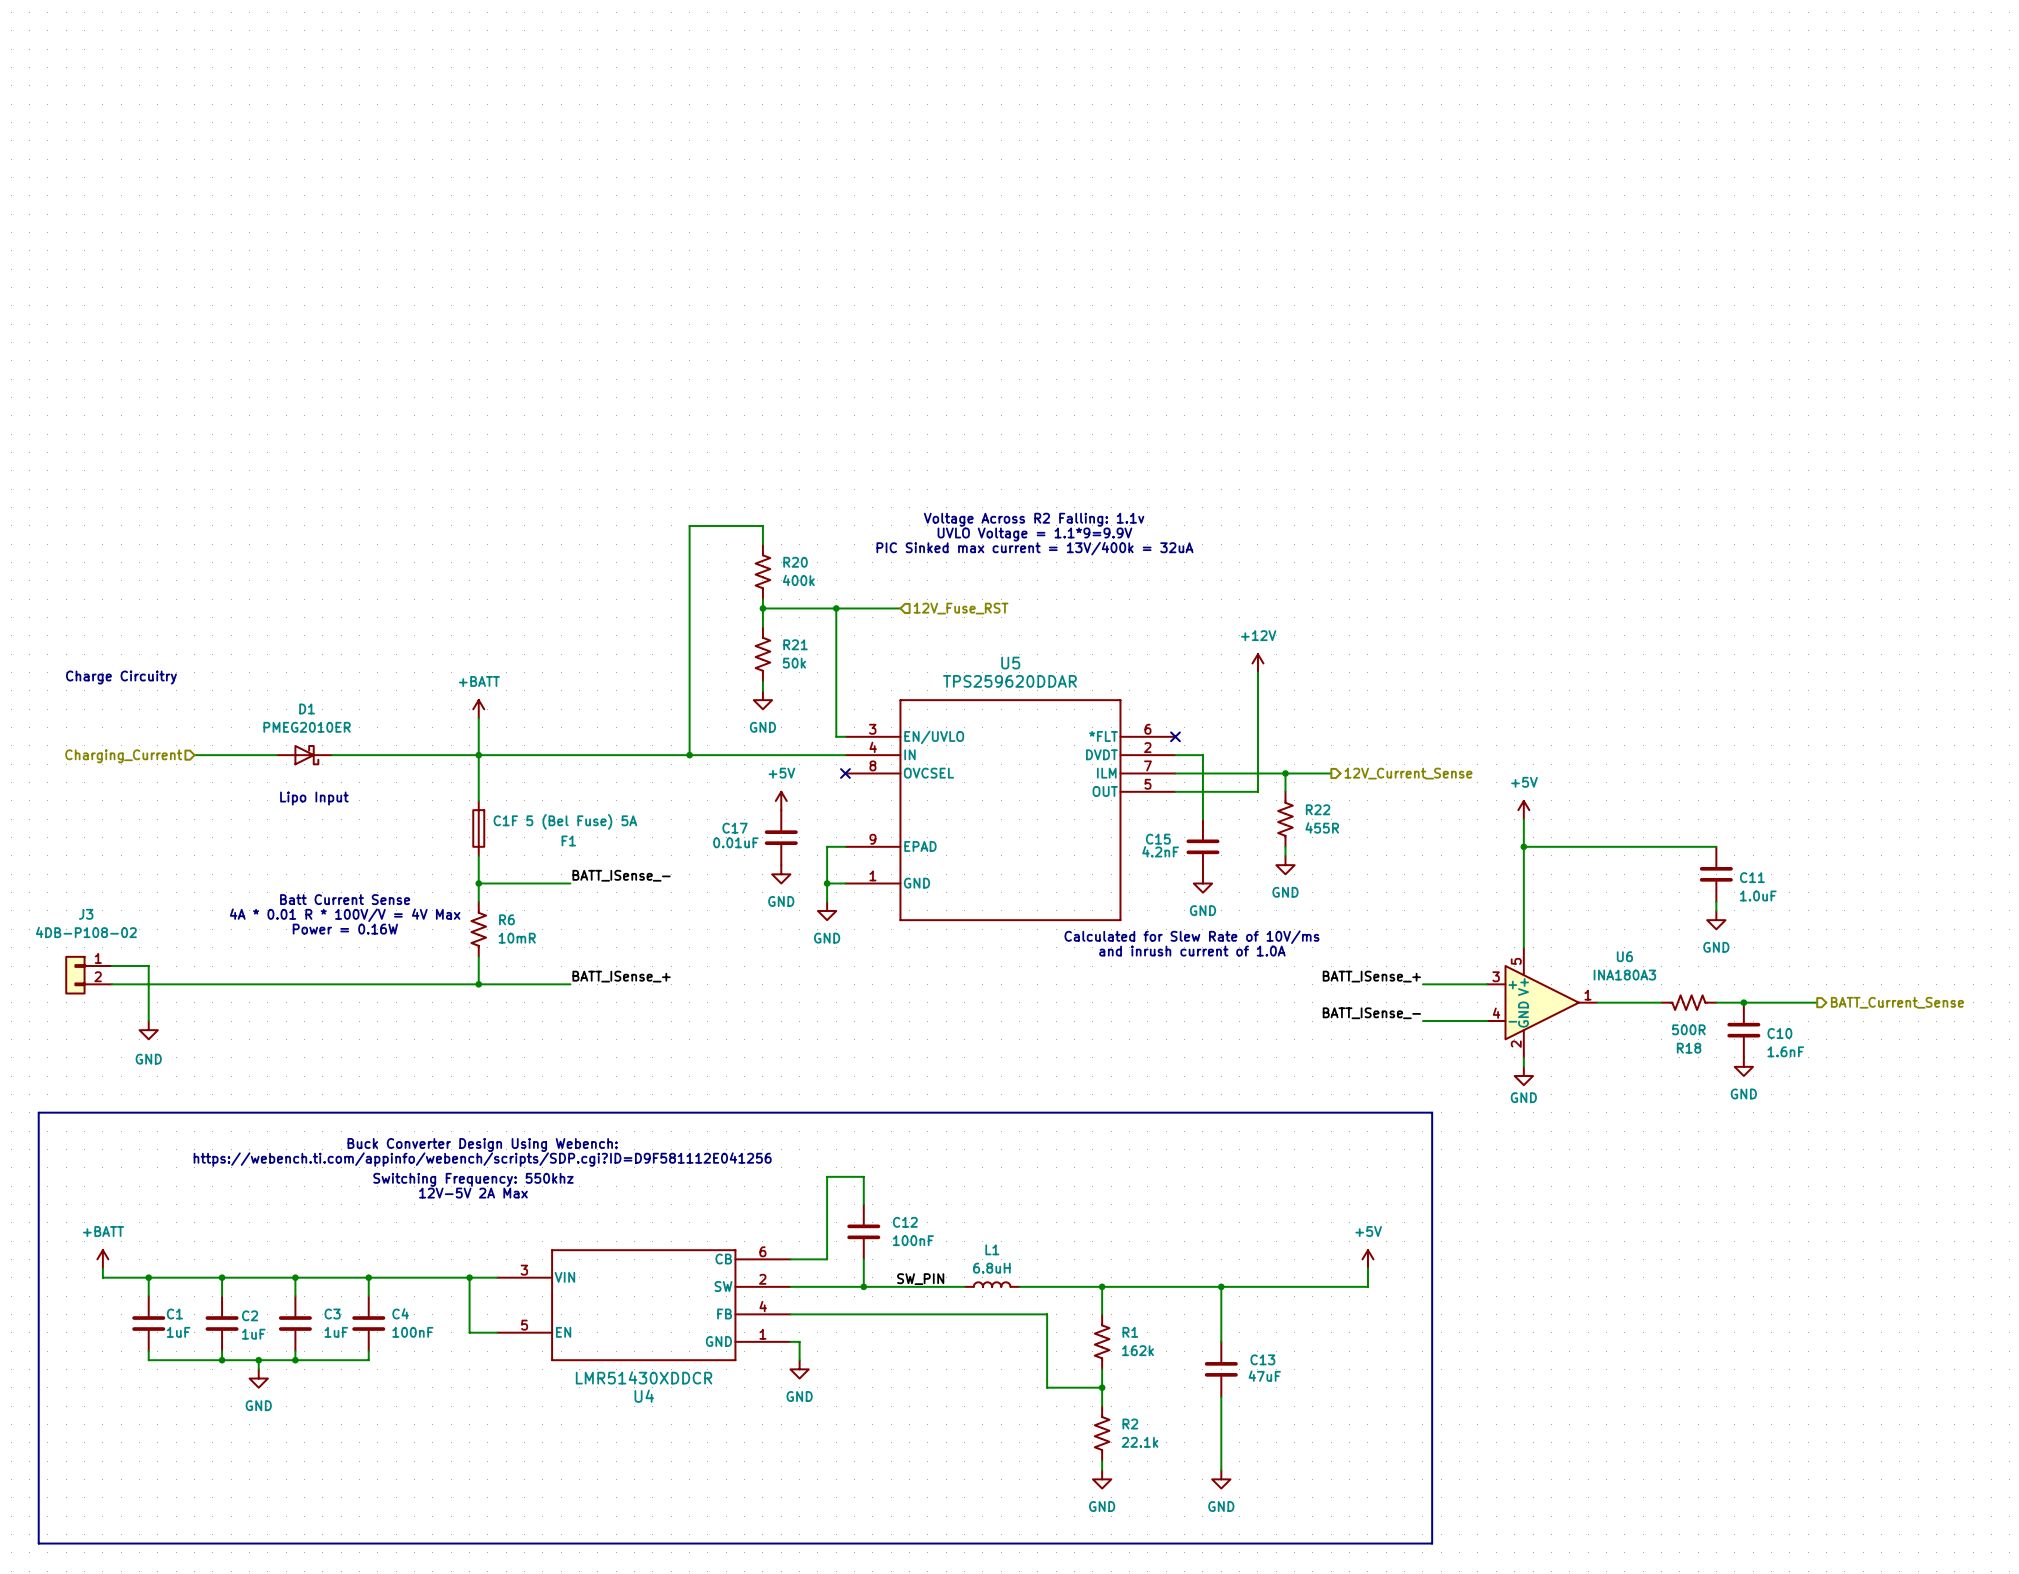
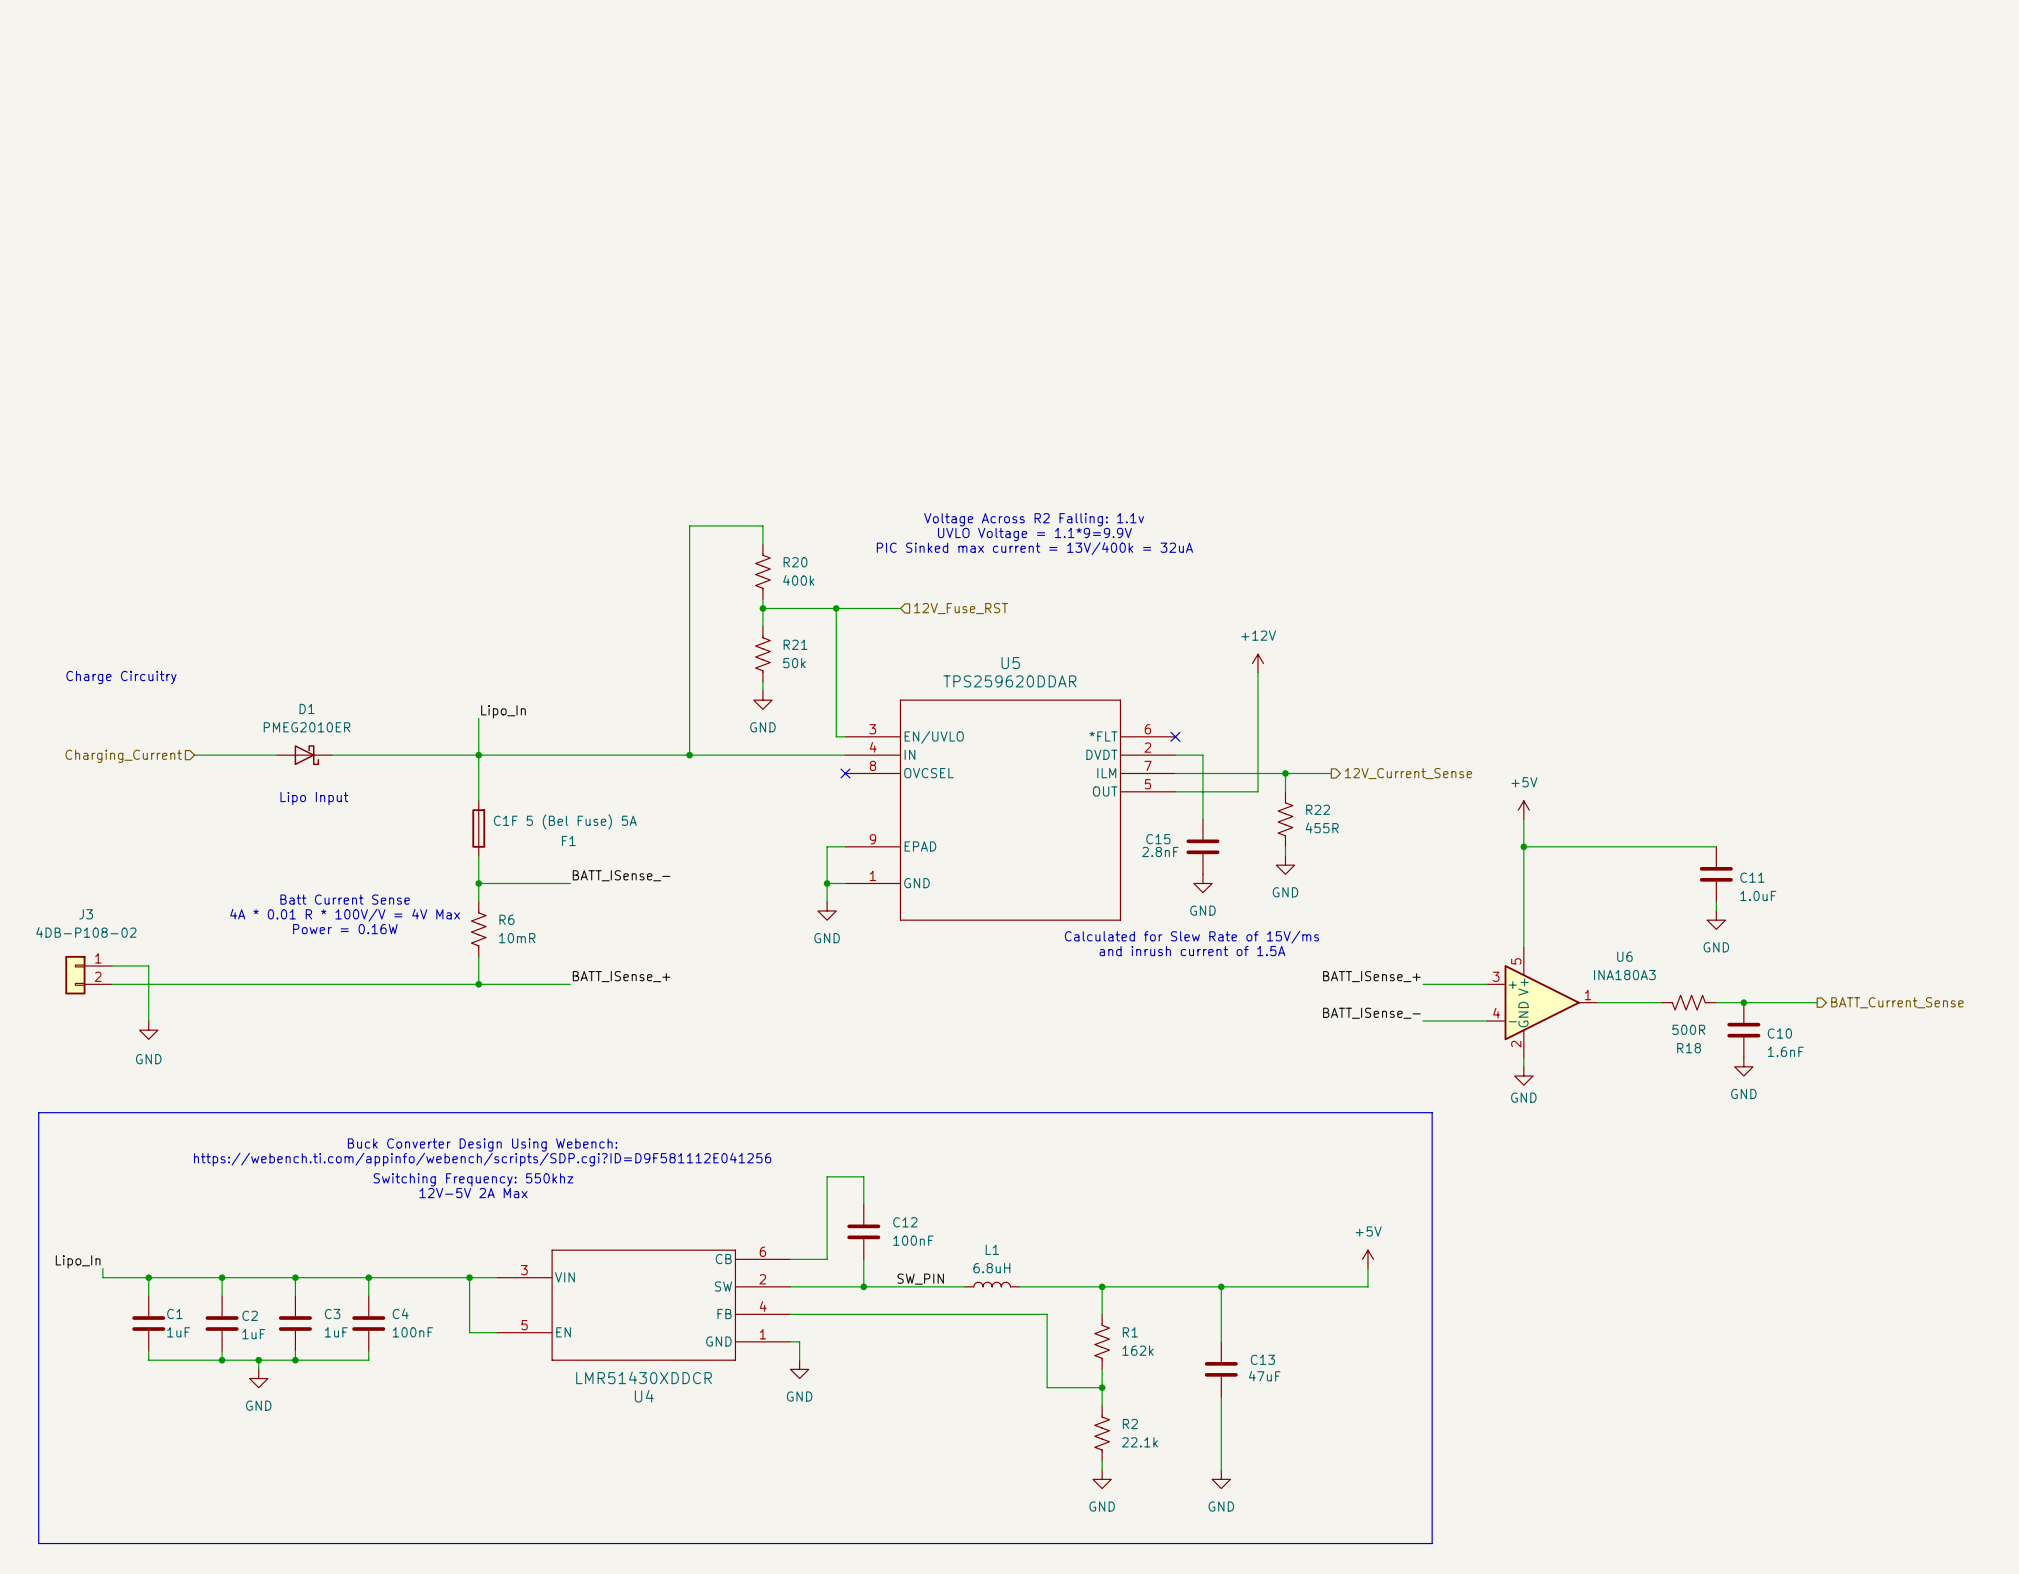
power symbol: +BATT (478, 709) -> none
label: none -> Lipo_In (503, 711)
power symbol: +5V (781, 800) -> none
C17: 0.01uF (781, 837) -> none
C15 value: 4.2nF (1160, 851) -> 2.8nF (1160, 851)
power symbol: GND (781, 874) -> none
text: Calculated for Slew Rate of 10V/ms (1191, 937) -> Calculated for Slew Rate of 15V/ms (1191, 937)
text: and inrush current of 1.0A (1192, 951) -> and inrush current of 1.5A (1192, 951)
power symbol: +BATT (102, 1259) -> none
label: none -> Lipo_In (78, 1261)

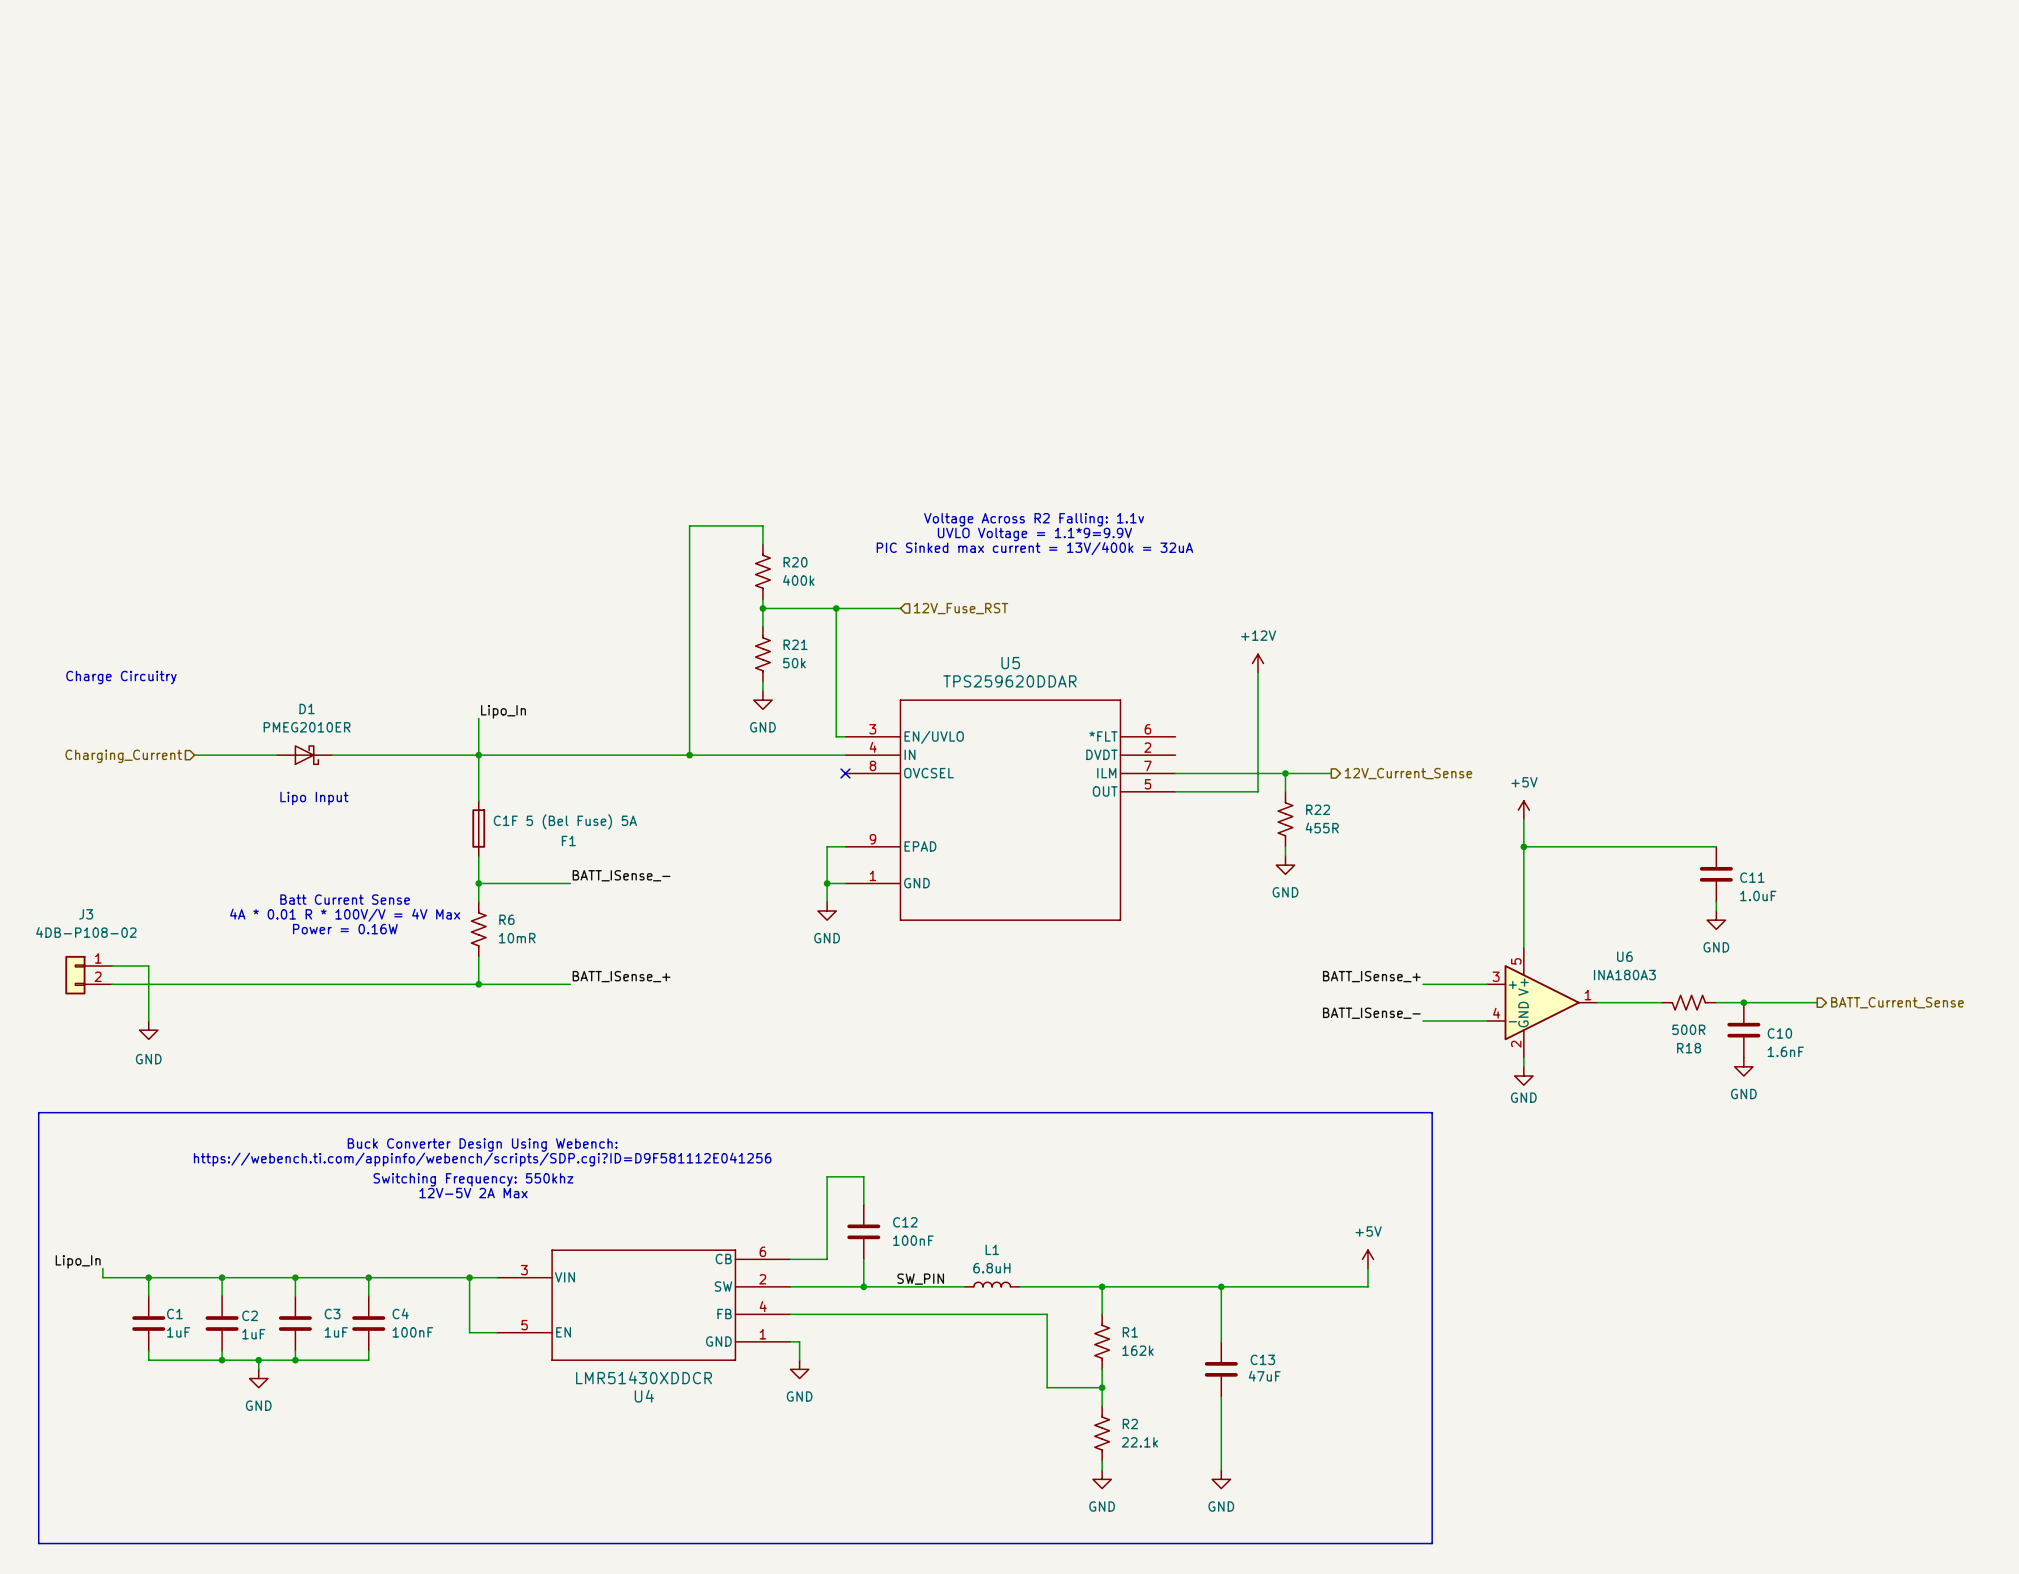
no-connect mark: (1175, 736) -> none
wire: (1175, 755) (1202, 755) (1202, 819) -> none
C15: 2.8nF (1202, 846) -> none
power symbol: GND (1202, 883) -> none
text: Calculated for Slew Rate of 15V/ms (1191, 937) -> none
text: and inrush current of 1.5A (1192, 951) -> none

